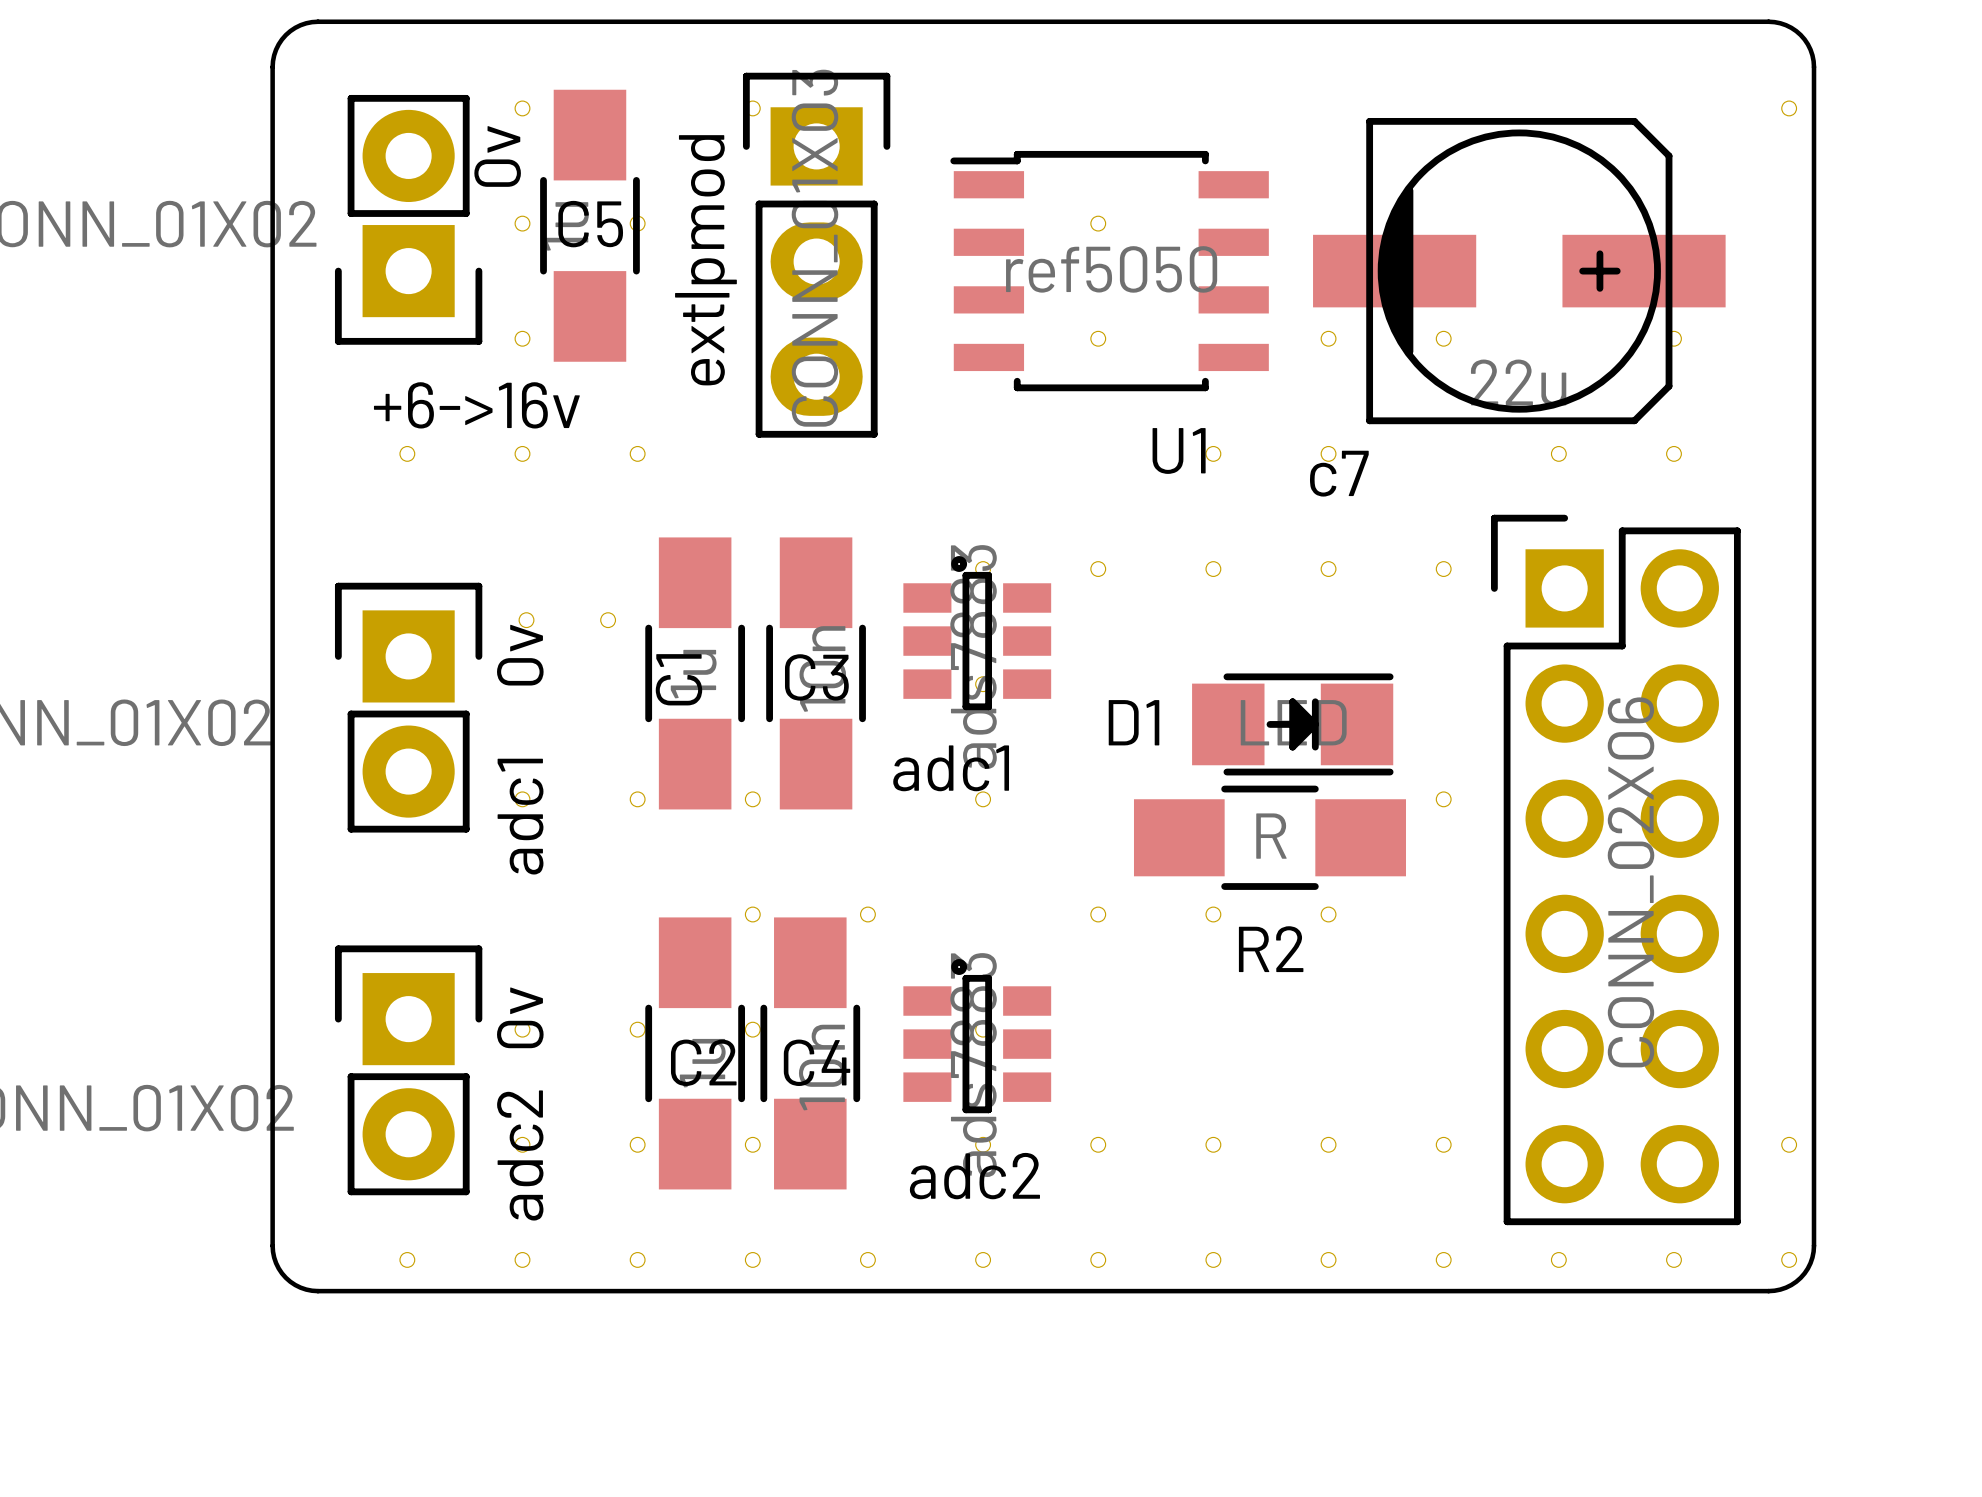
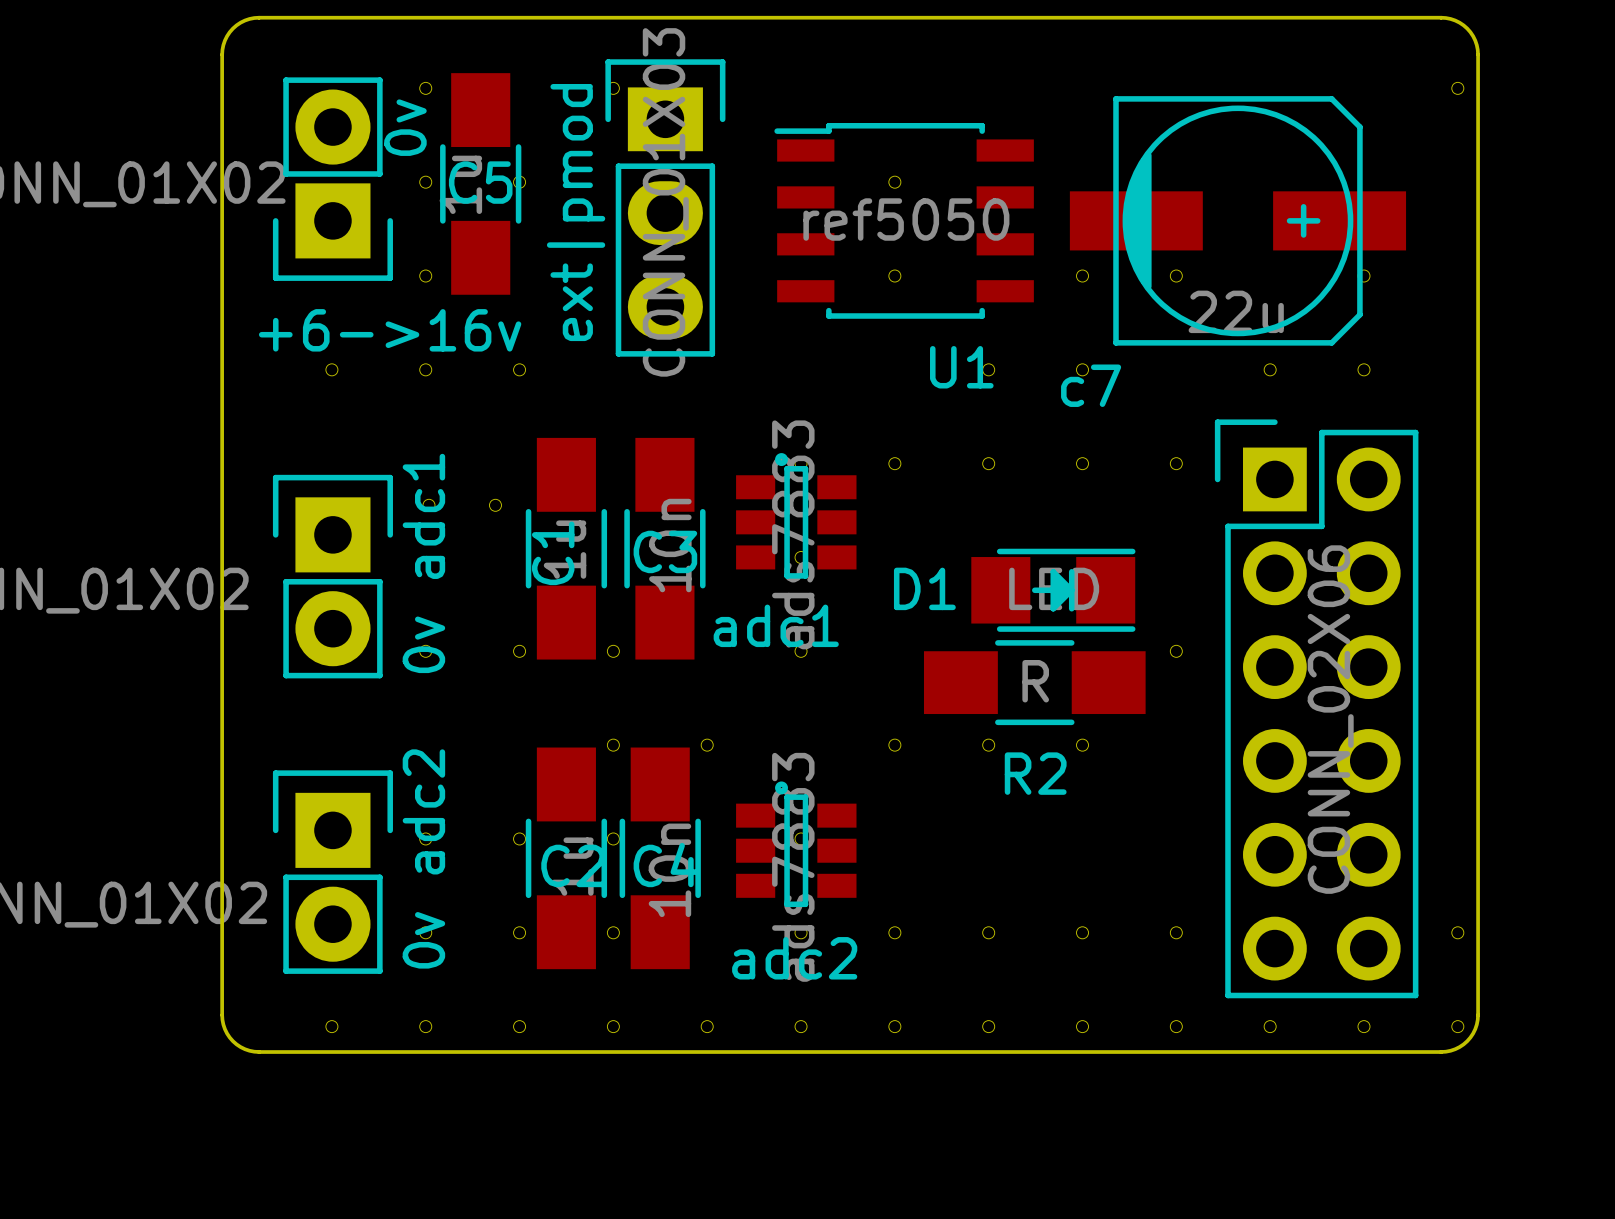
text: 0v (520, 655) -> none
text: none -> 0v (423, 644)
text position: adc1 (520, 816) -> adc1 (423, 516)
text: 0v (520, 1017) -> adc2 (423, 811)
text: adc2 (520, 1155) -> 0v (423, 940)

